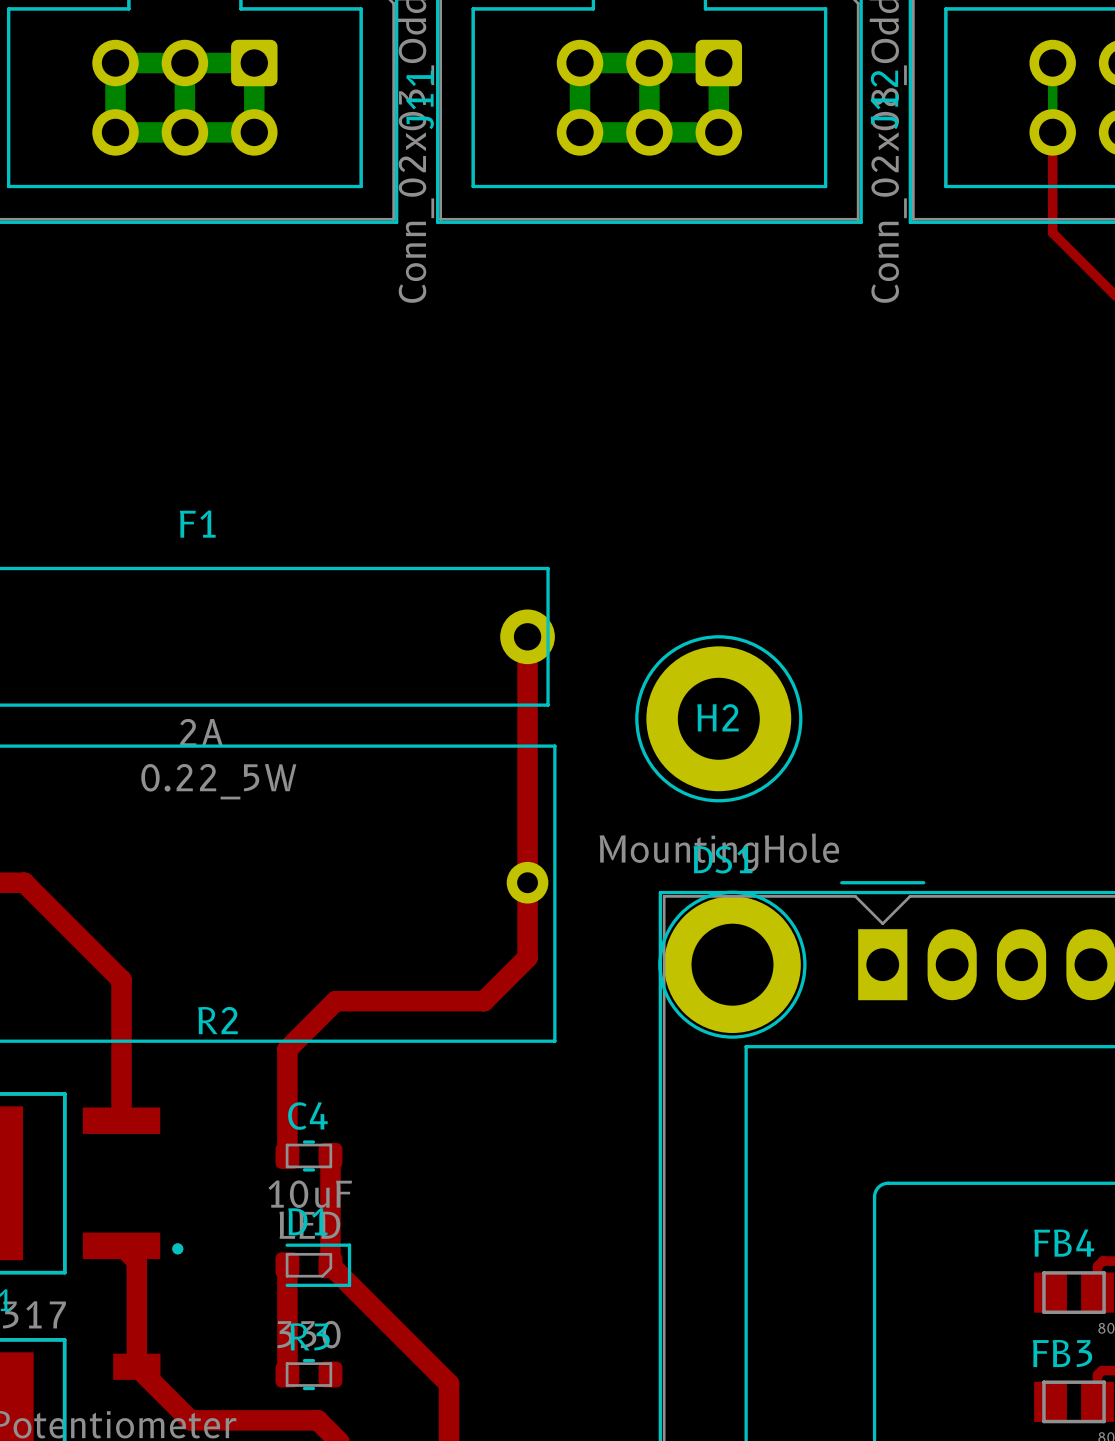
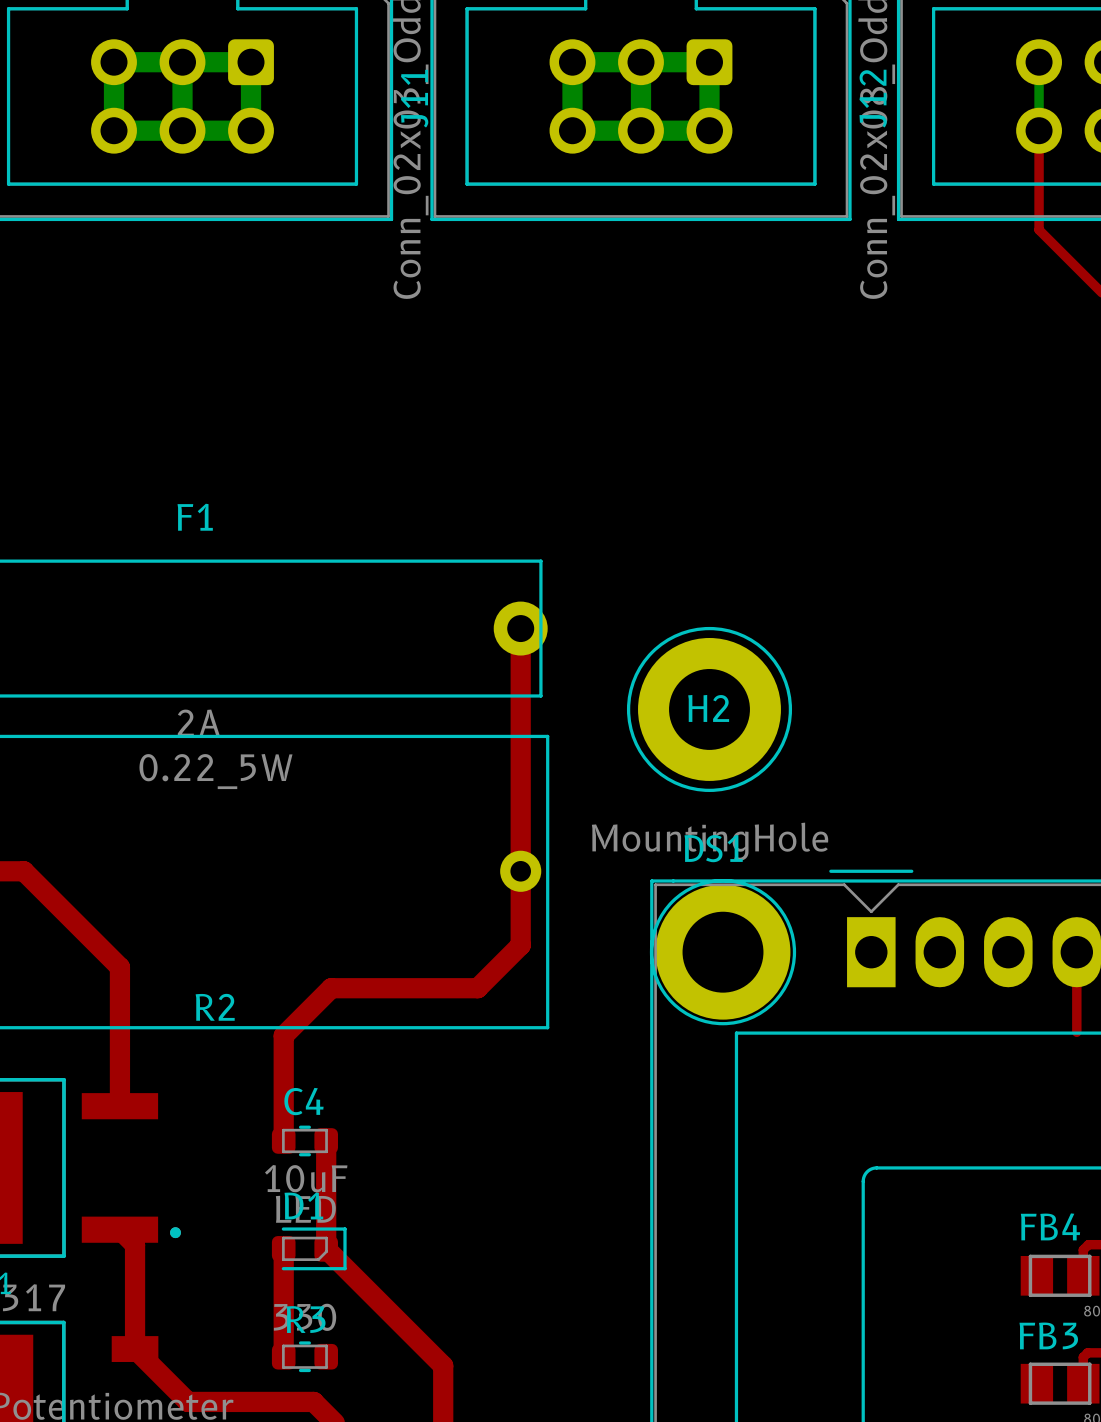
top track: none -> (1076, 952) (1076, 1032)

